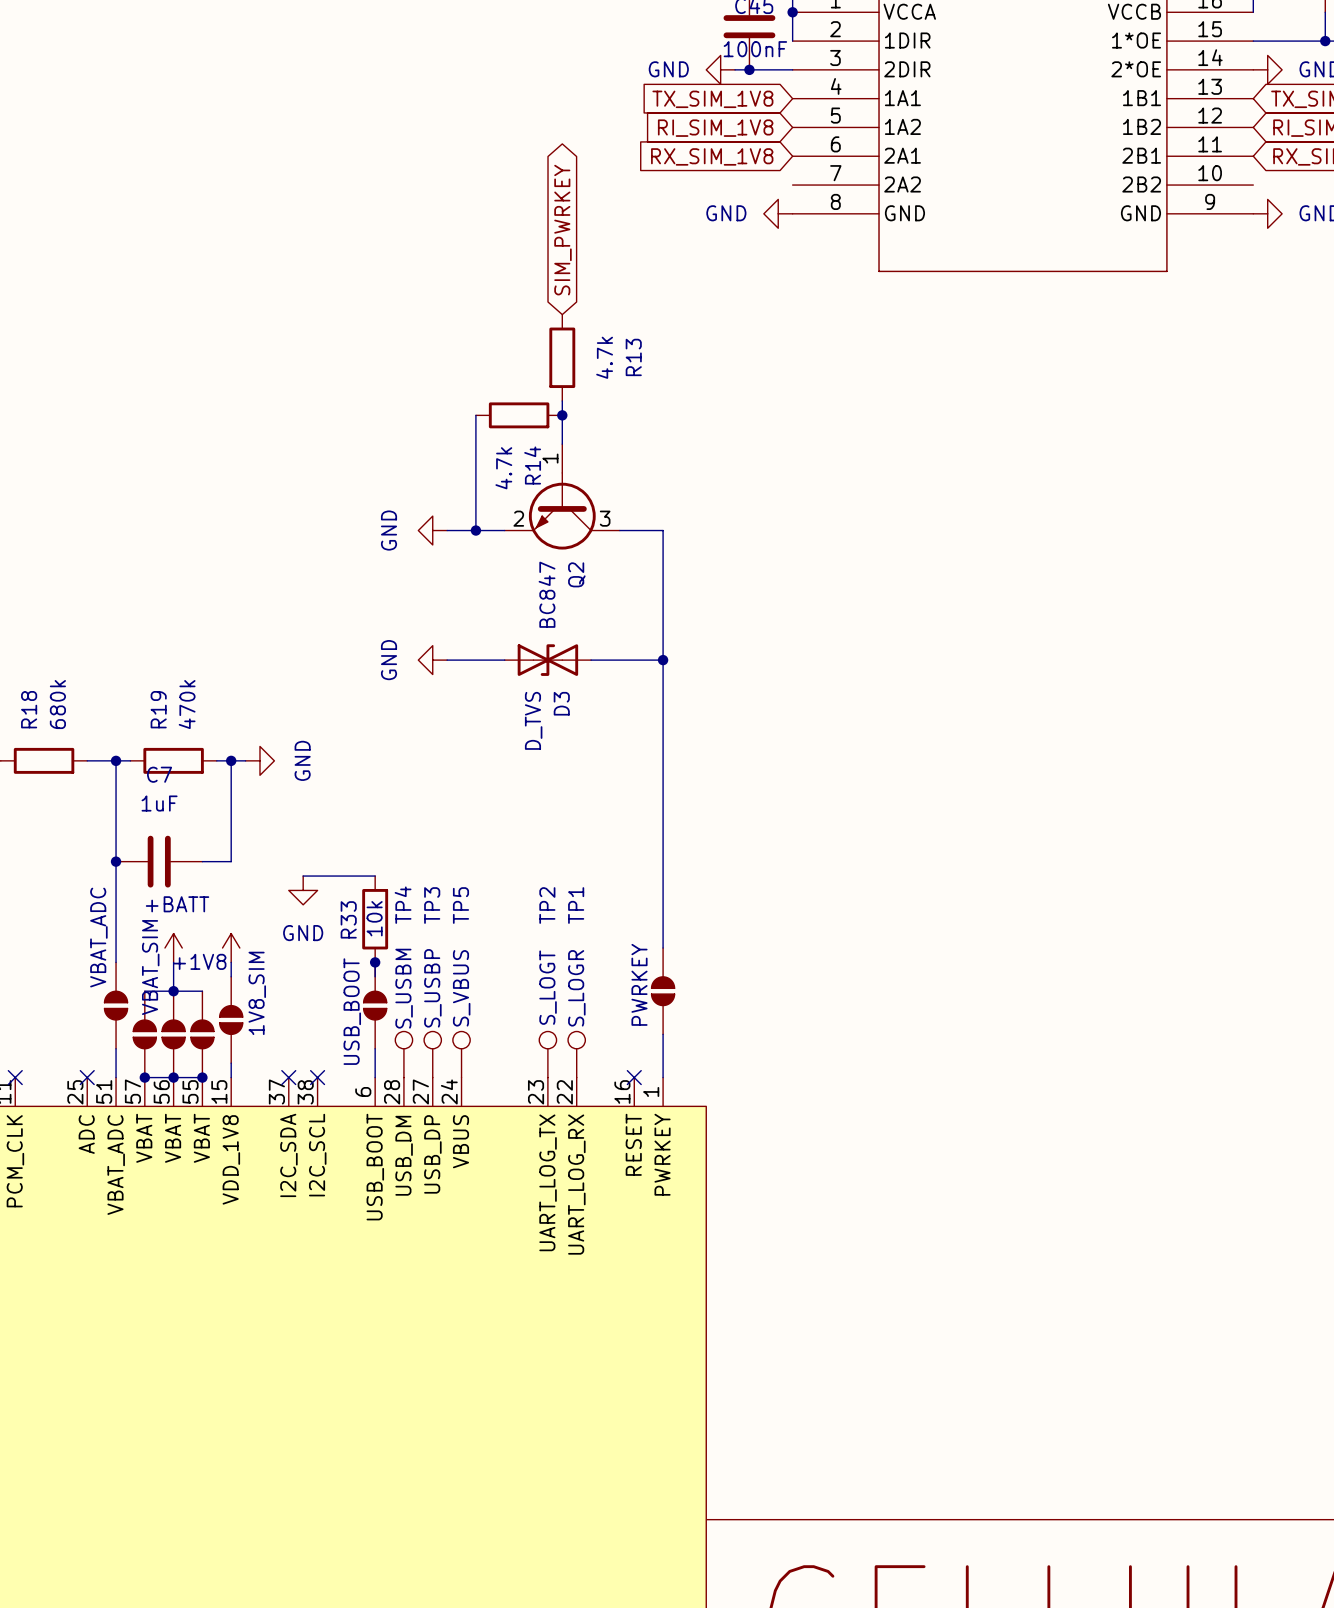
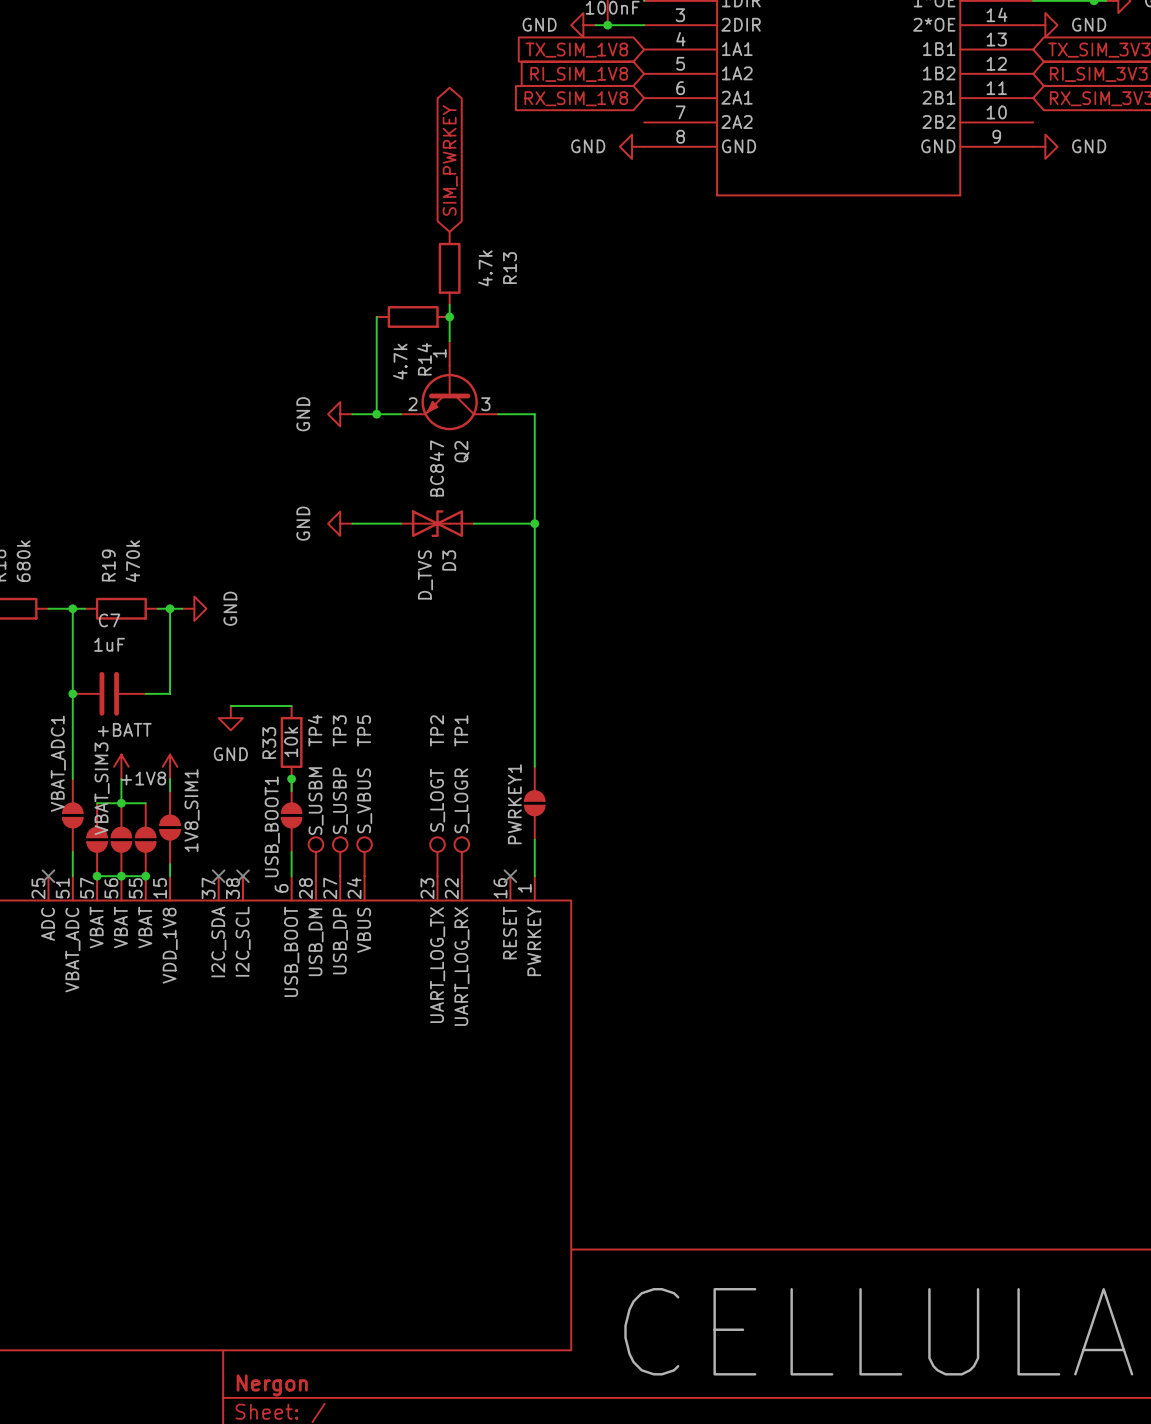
VBAT_ADC name: VBAT_ADC (98, 937) -> VBAT_ADC1 (58, 763)
VBAT_SIM name: VBAT_SIM (150, 967) -> VBAT_SIM3 (102, 788)
PWRKEY name: PWRKEY (639, 984) -> PWRKEY1 (514, 804)
1V8_SIM name: 1V8_SIM (257, 993) -> 1V8_SIM1 (192, 810)
USB_BOOT name: USB_BOOT (352, 1011) -> USB_BOOT1 (272, 826)

